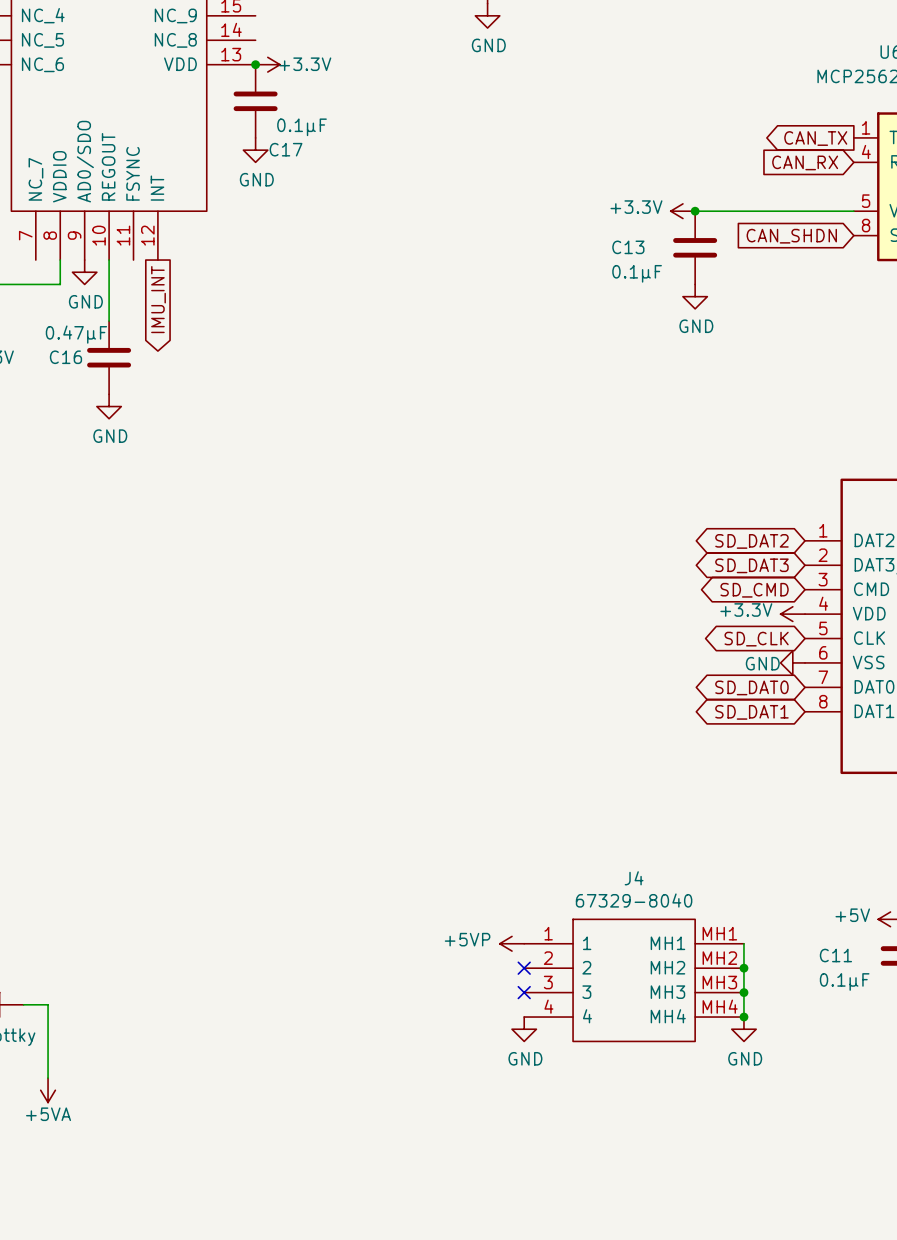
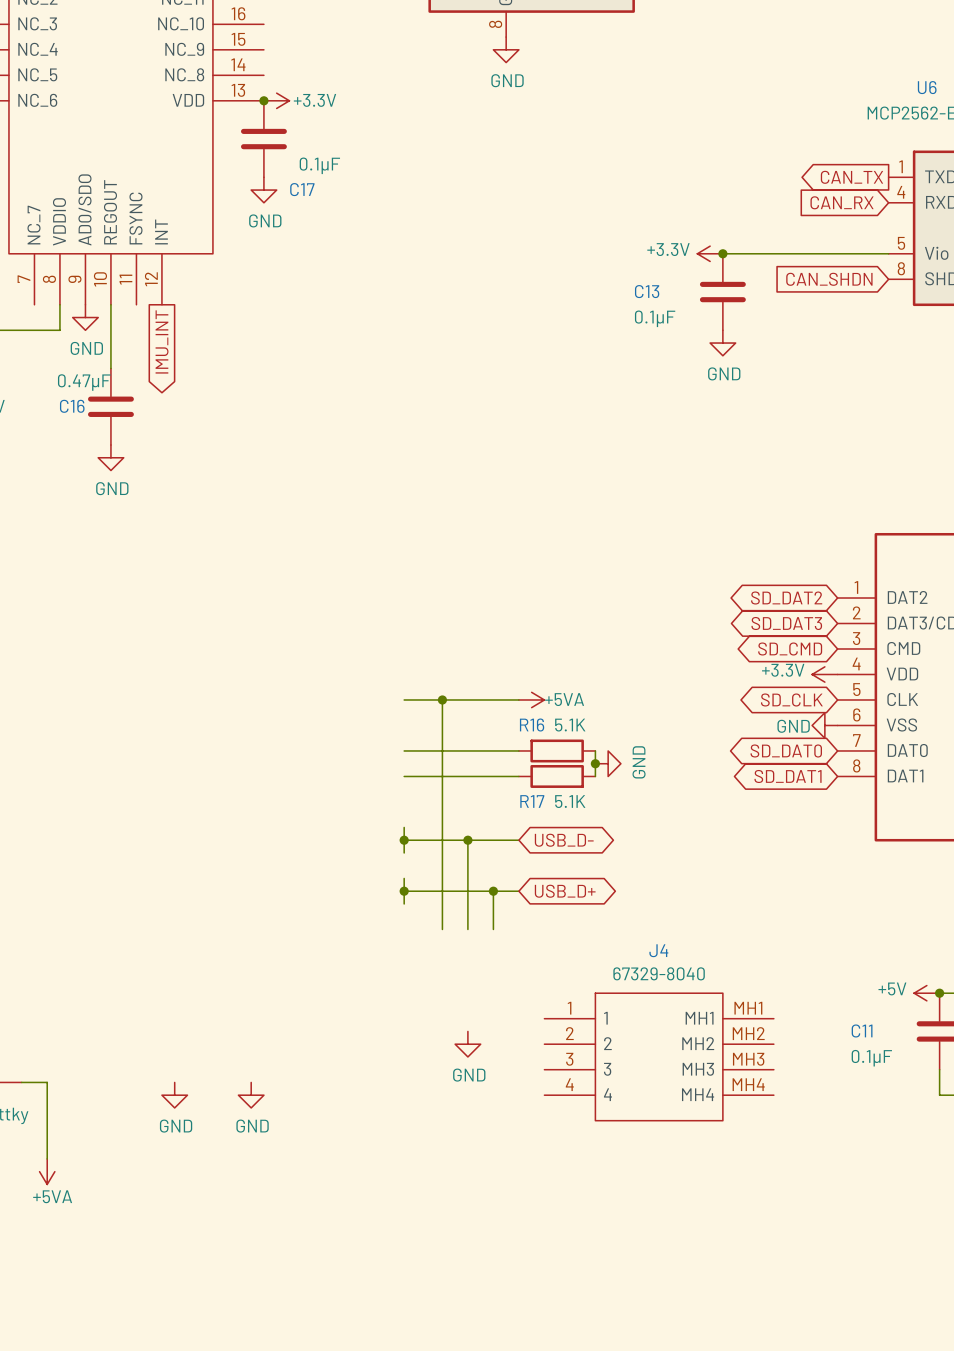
wire: none -> (404, 699) (518, 699)
wire: none -> (442, 699) (442, 929)
junction: none -> (442, 699)
power symbol: none -> +5VA (531, 699)
wire: none -> (404, 750) (518, 750)
R16: none -> 5.1K (557, 750)
wire: none -> (595, 750) (595, 776)
junction: none -> (595, 763)
power symbol: none -> GND (608, 763)
wire: none -> (404, 776) (518, 776)
R17: none -> 5.1K (557, 776)
wire: none -> (404, 827) (404, 852)
wire: none -> (404, 840) (518, 840)
junction: none -> (404, 840)
wire: none -> (467, 840) (467, 929)
junction: none -> (467, 840)
global label: none -> USB_D- (564, 840)
wire: none -> (404, 878) (404, 903)
wire: none -> (404, 891) (518, 891)
junction: none -> (404, 891)
wire: none -> (493, 891) (493, 929)
junction: none -> (493, 891)
global label: none -> USB_D+ (565, 891)
power symbol: +5VP (512, 943) -> none
wire: (743, 943) (743, 1017) -> none
no-connect mark: (524, 968) -> none
junction: (743, 968) -> none
no-connect mark: (524, 992) -> none
junction: (743, 992) -> none
power symbol: none -> GND (174, 1095)
power symbol: none -> GND (251, 1095)
junction: (743, 1017) -> none
power symbol position: GND (524, 1029) -> GND (467, 1044)
power symbol: GND (743, 1029) -> none

